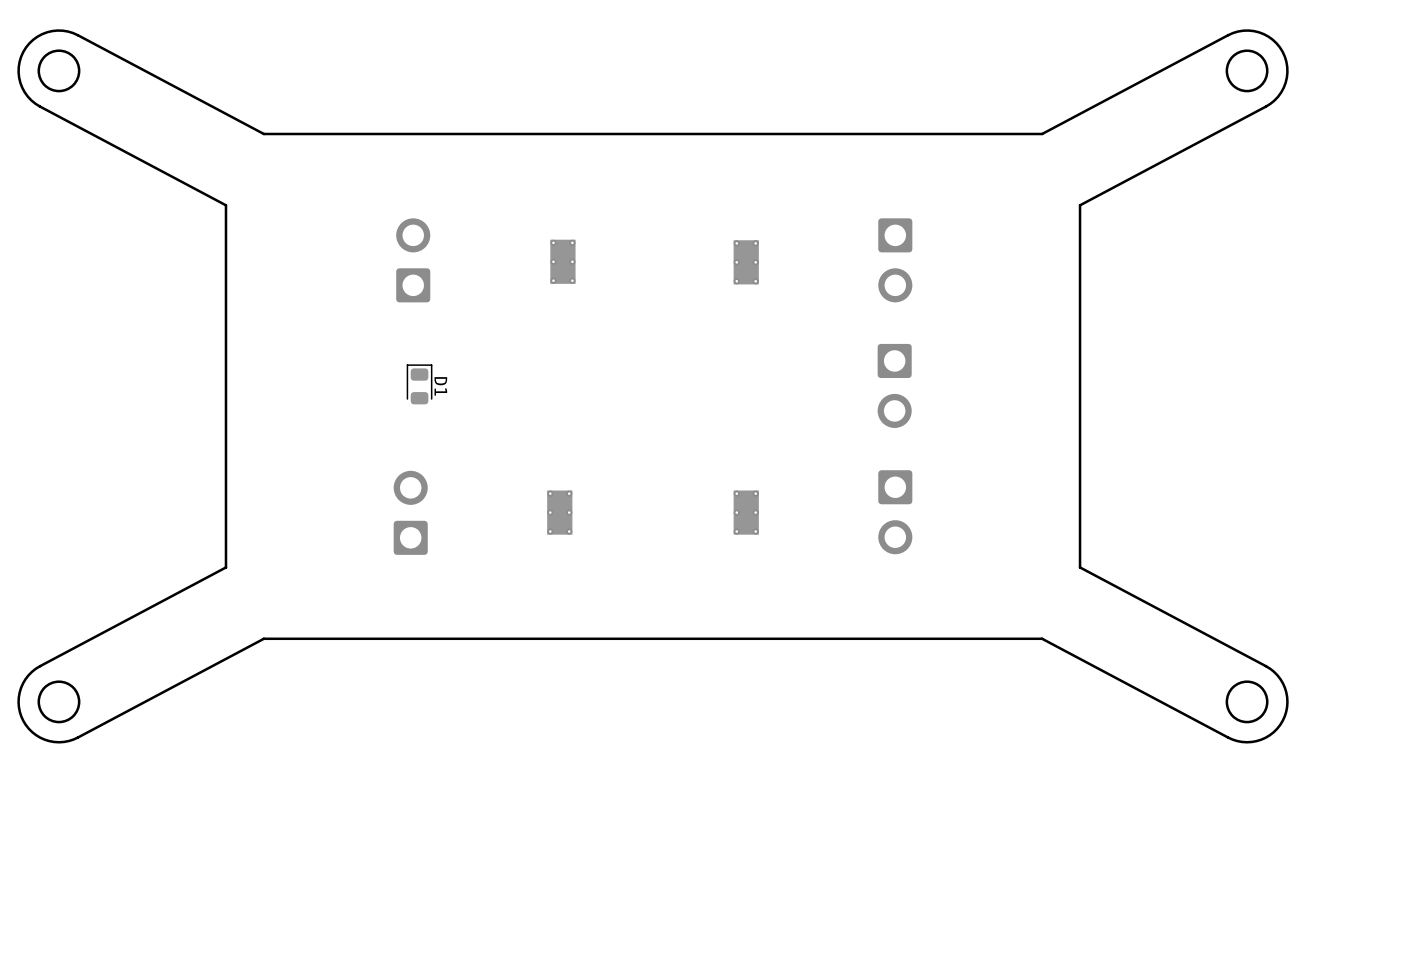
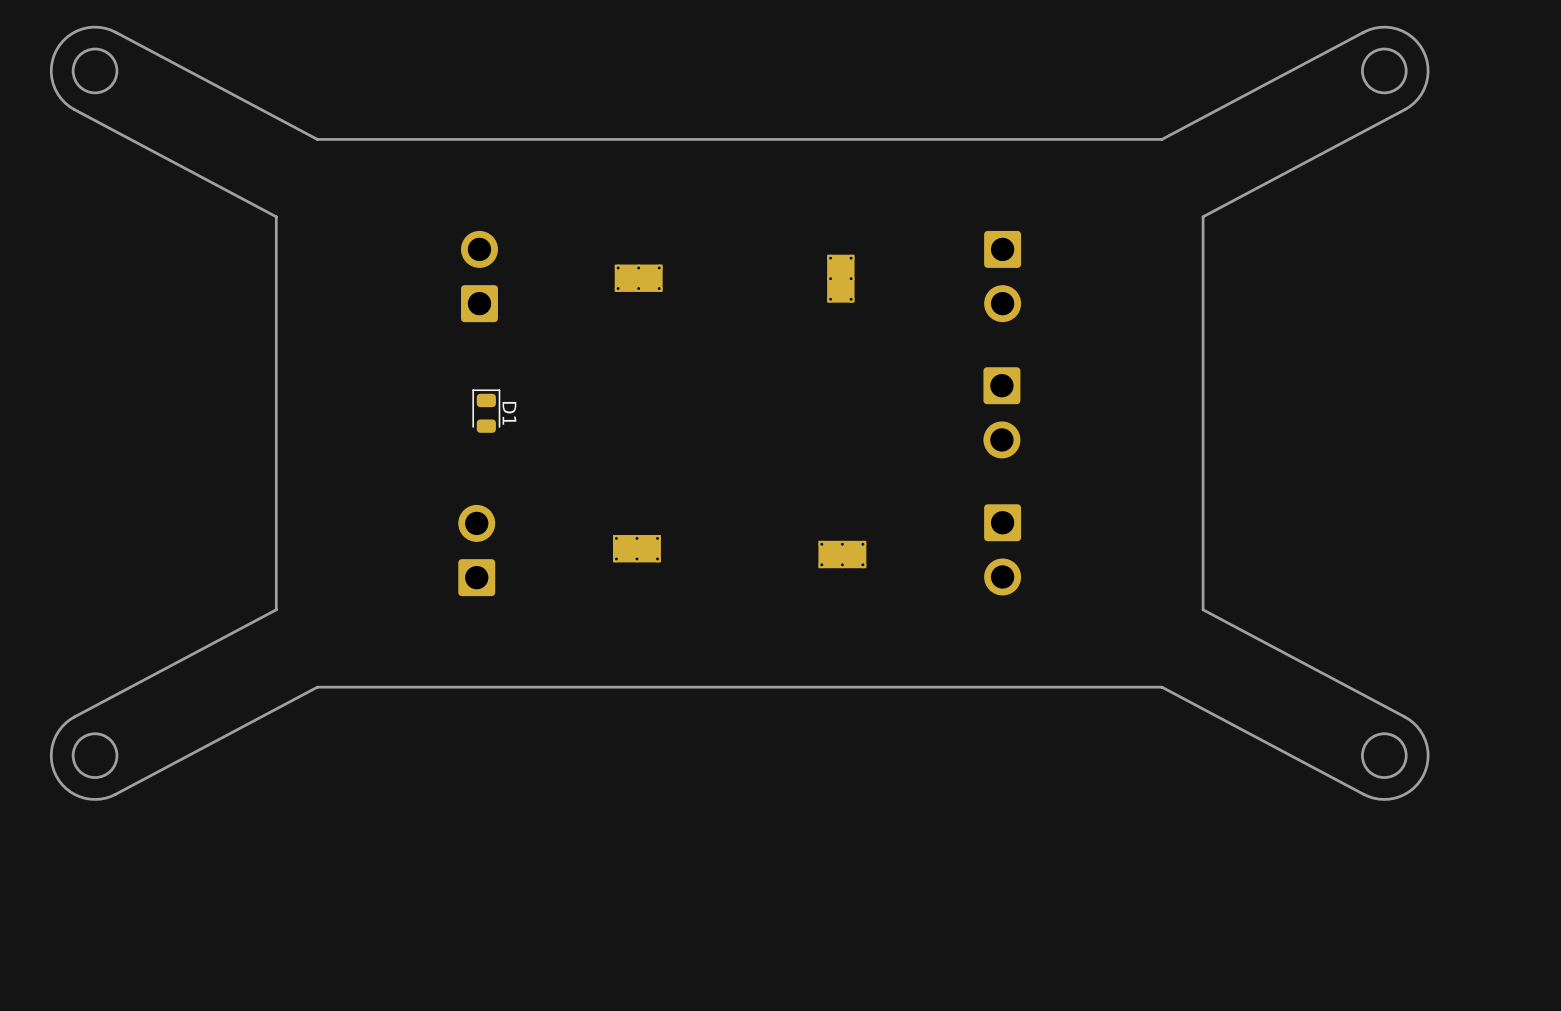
part rotation: 0° (562, 261) -> 90° clockwise (638, 278)
part rotation: 0° (559, 512) -> 90° clockwise (636, 548)
part rotation: 0° (746, 512) -> 90° clockwise (842, 554)

